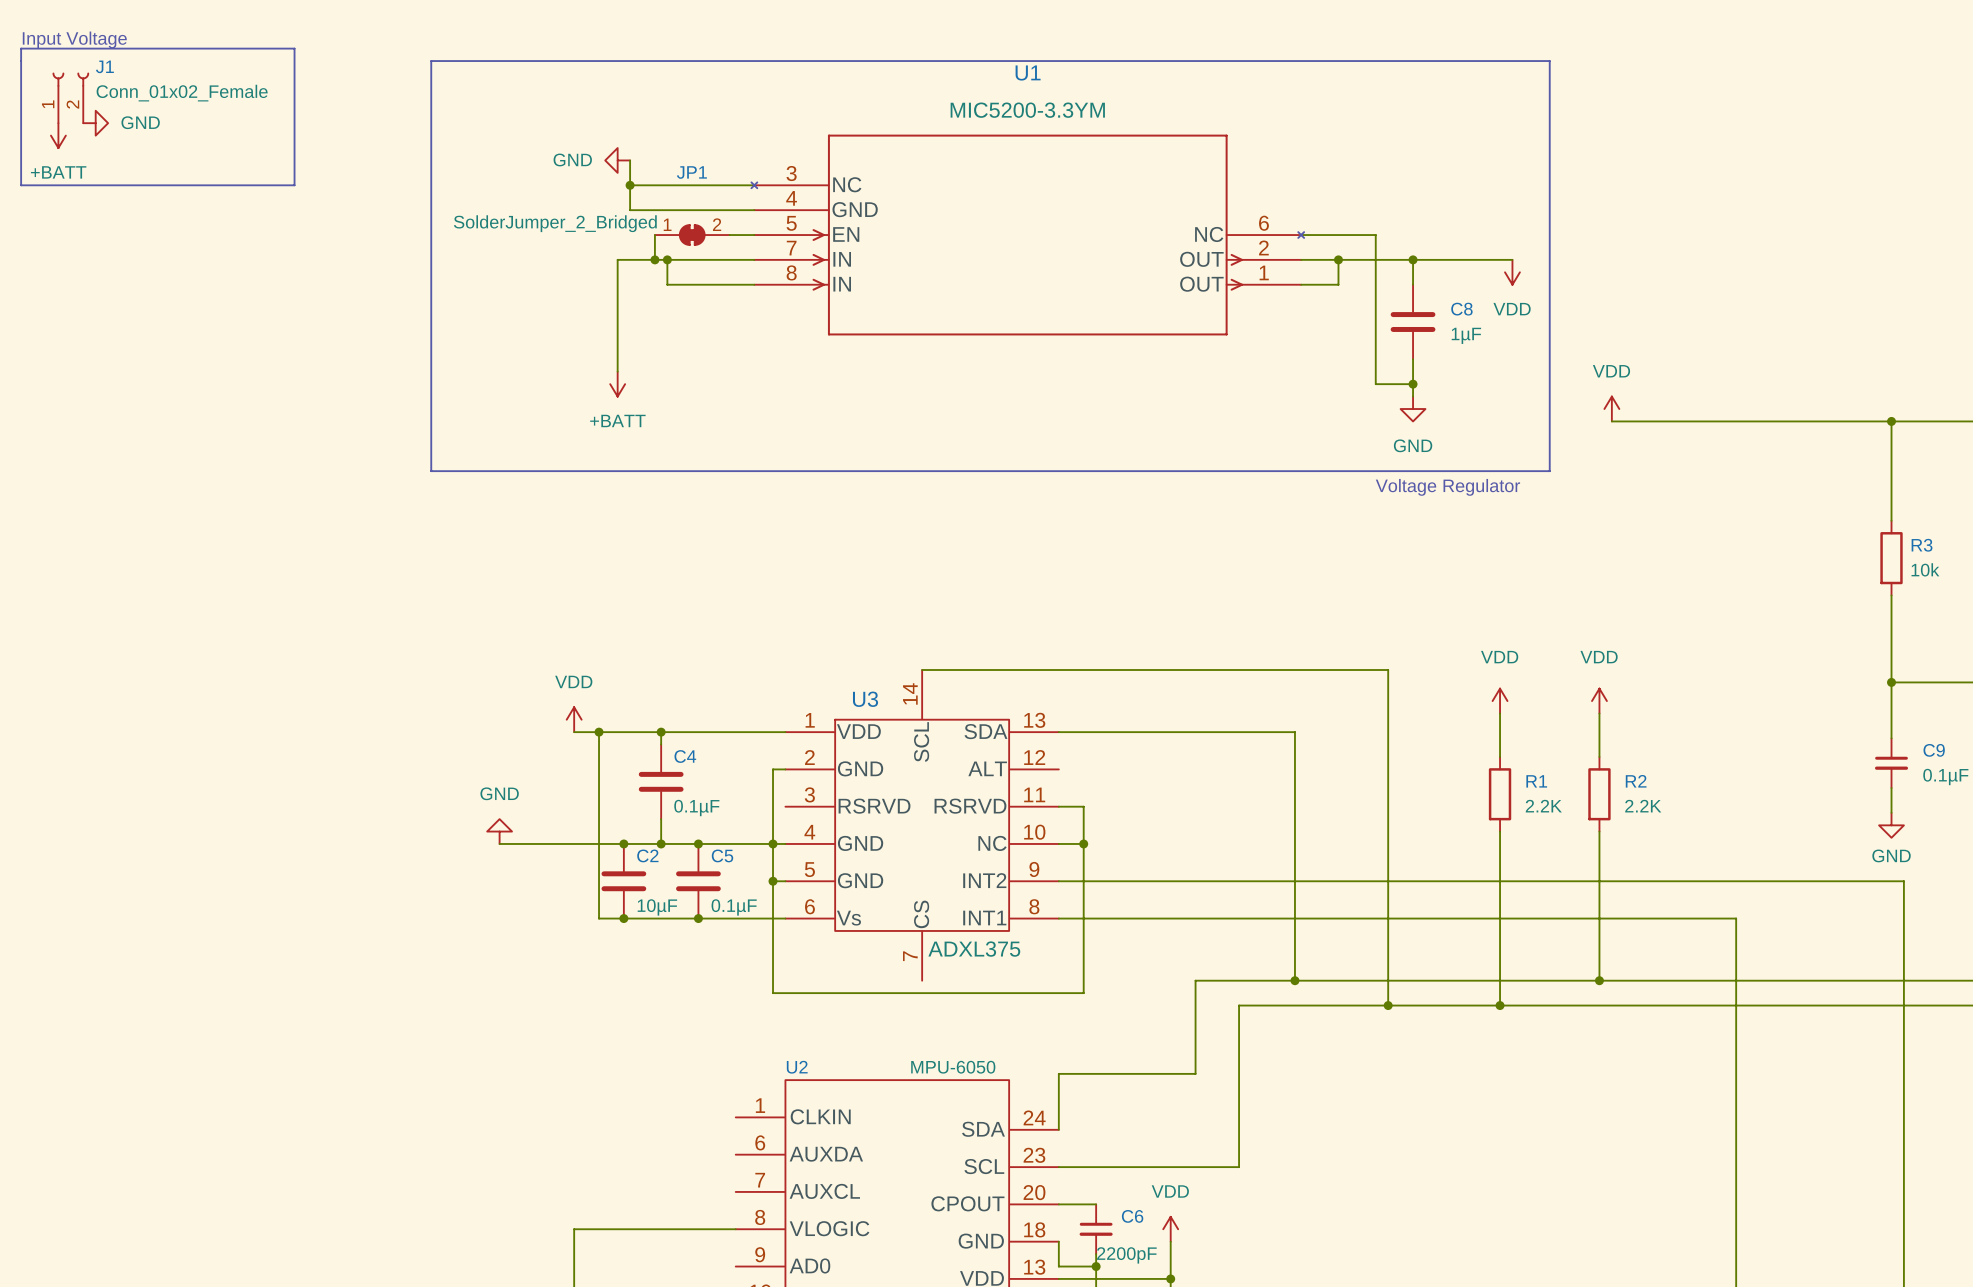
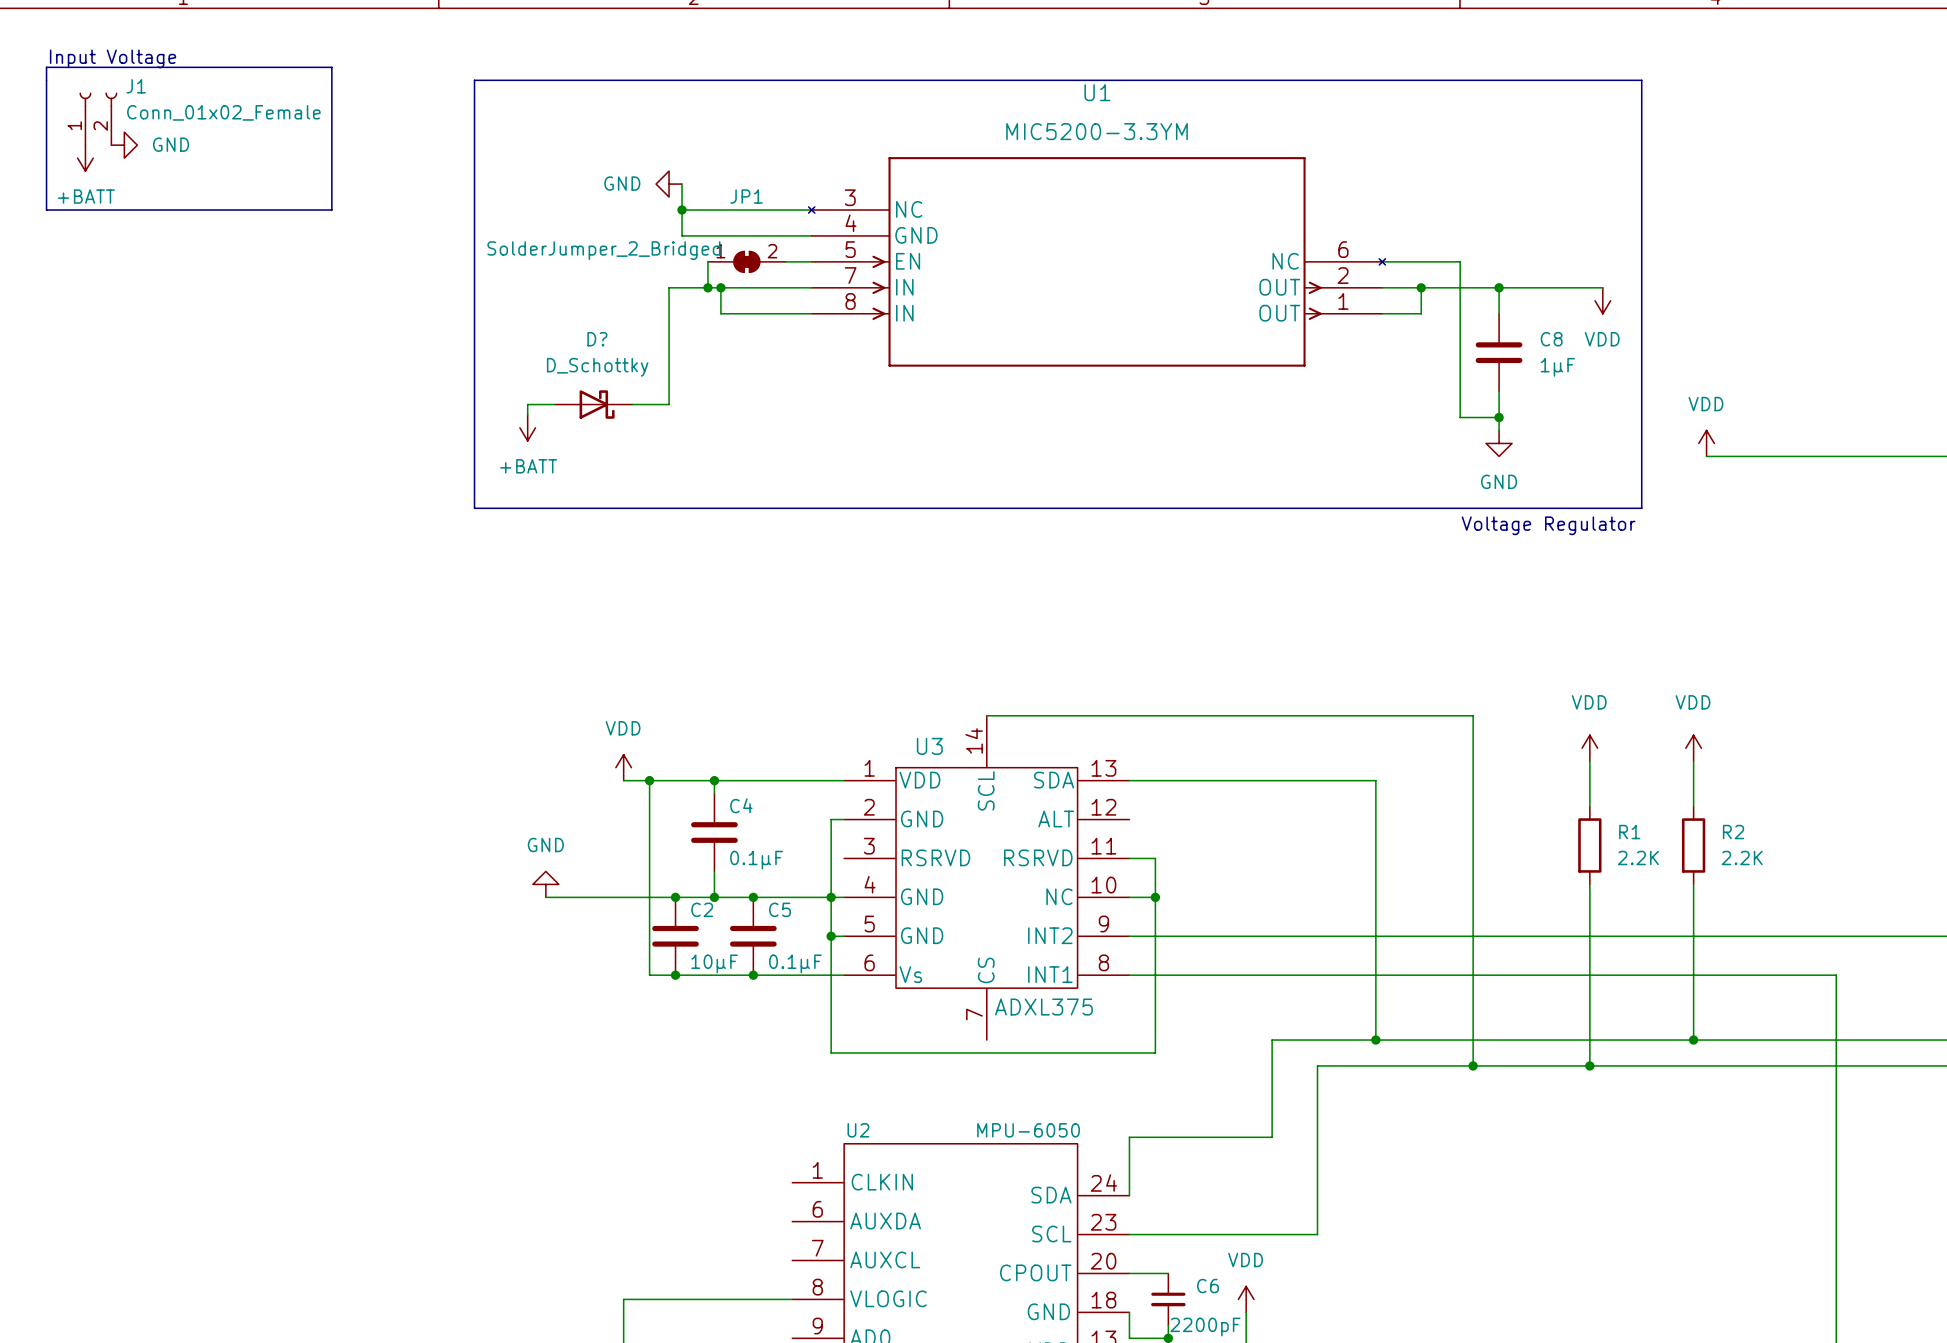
wire: none -> (554, 404) (527, 404) (527, 414)
D?: none -> D_Schottky (593, 404)
wire: none -> (632, 404) (669, 404)
power symbol position: +BATT (617, 384) -> +BATT (527, 427)

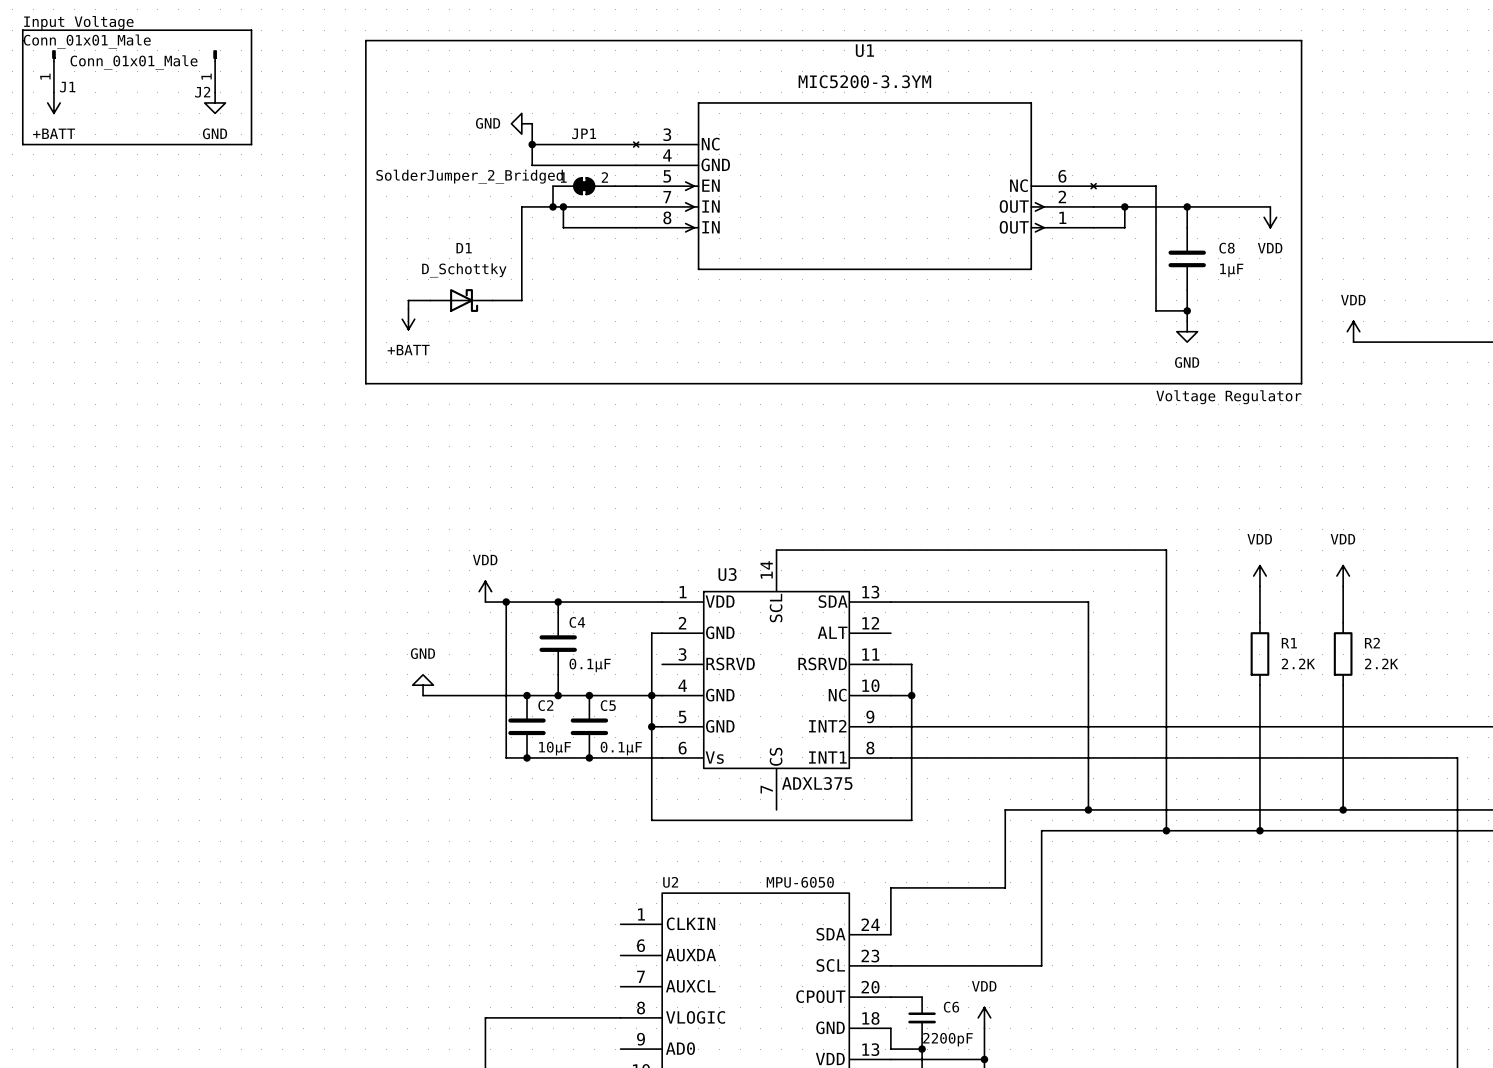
J1 name position: J1 (136, 86) -> J1 (67, 87)
J1 symbol: [79, 92, 118, 146] -> [52, 50, 56, 93]
J1 value: Conn_01x02_Female (223, 112) -> Conn_01x01_Male (87, 41)
J2: none -> Conn_01x01_Male (215, 71)
power symbol rotation: 0° (124, 145) -> 90° clockwise (215, 102)
power symbol position: GND (124, 145) -> GND (215, 102)
D? name: D? (597, 339) -> D1 (464, 248)

